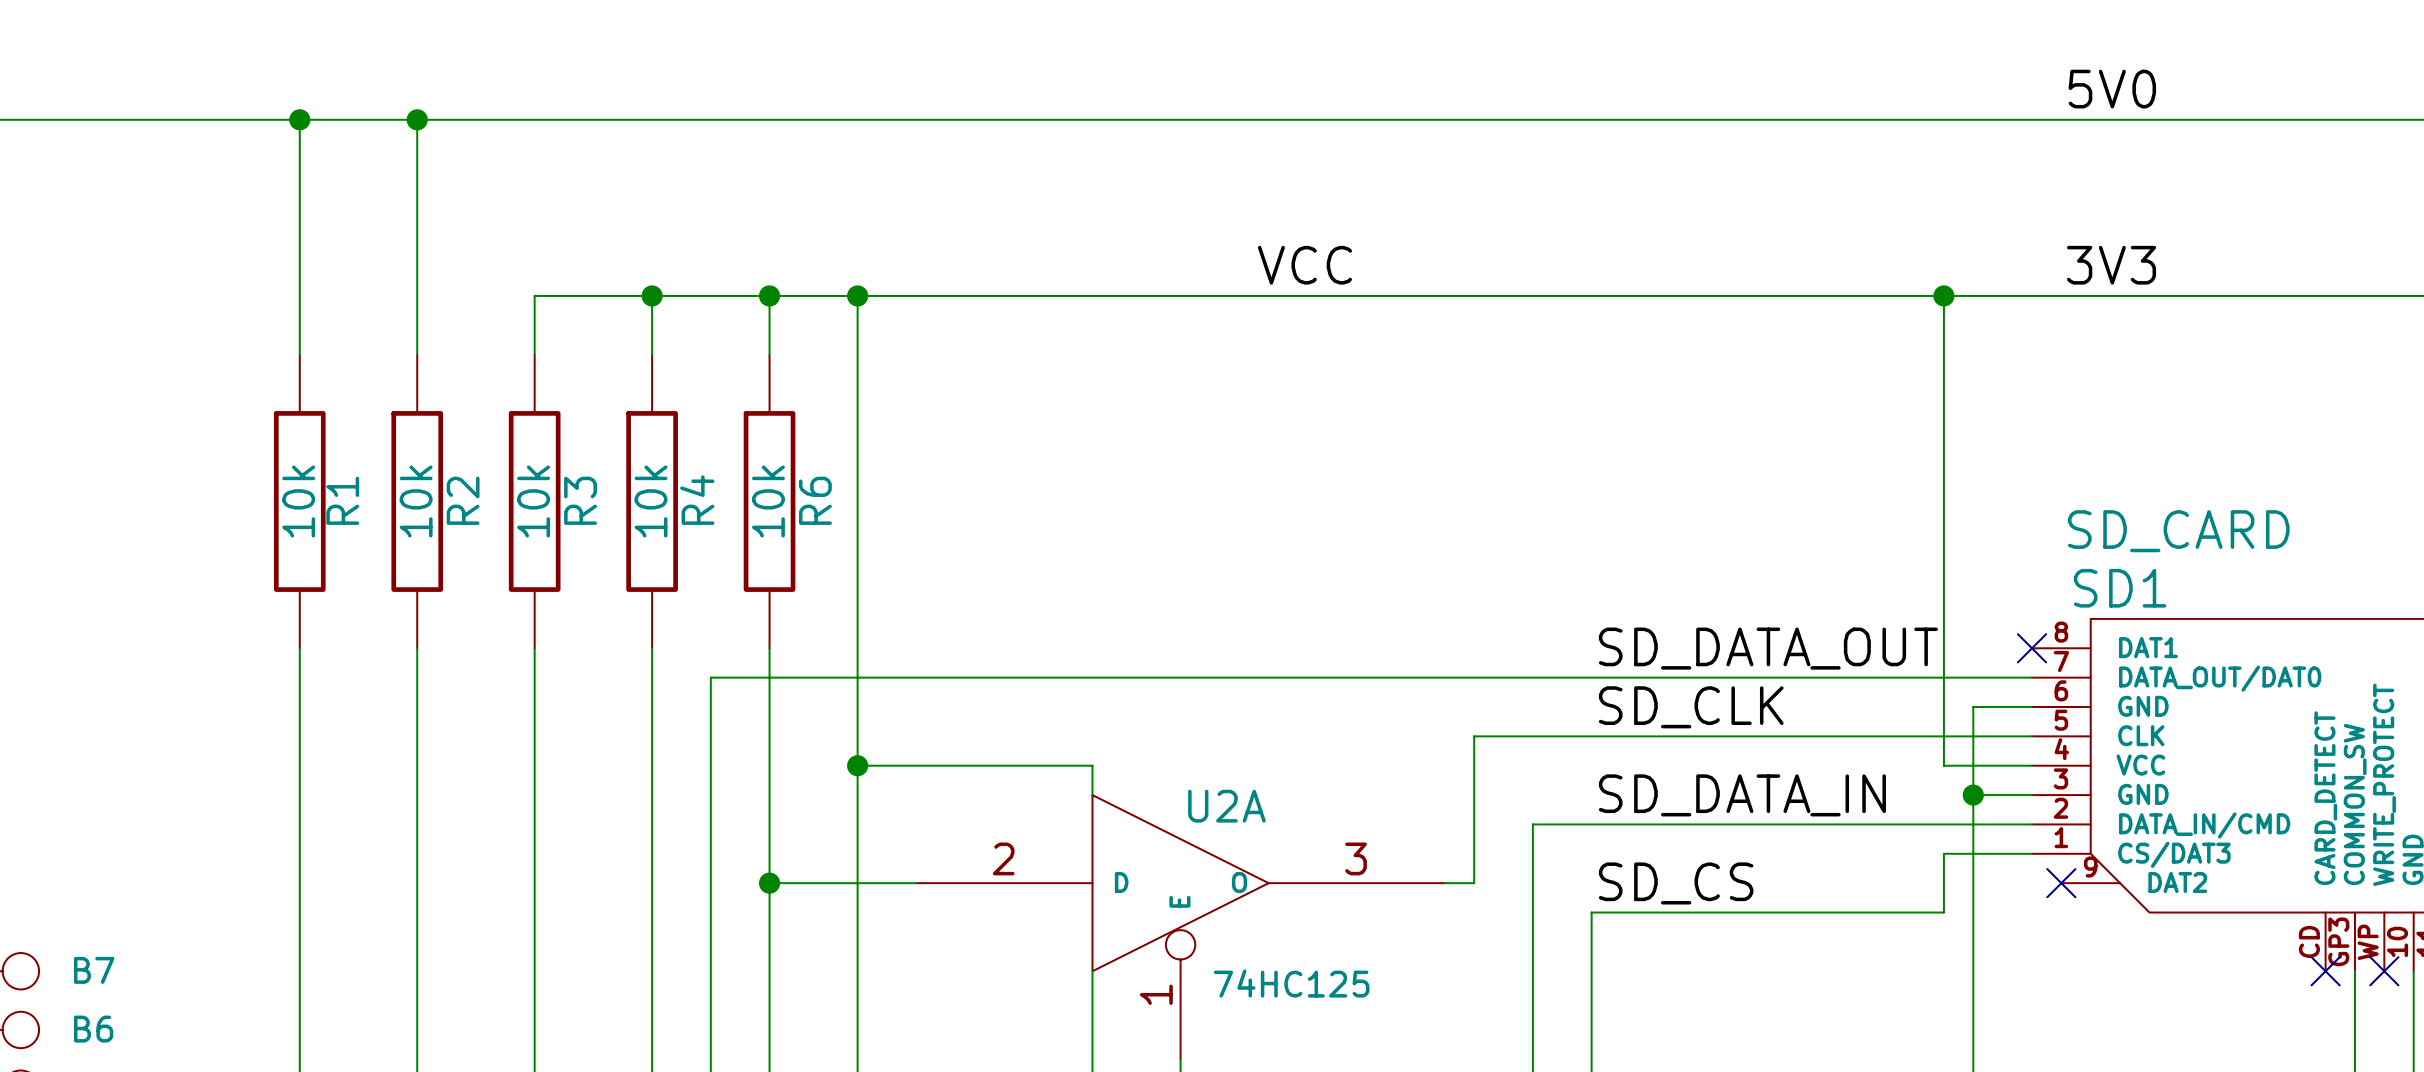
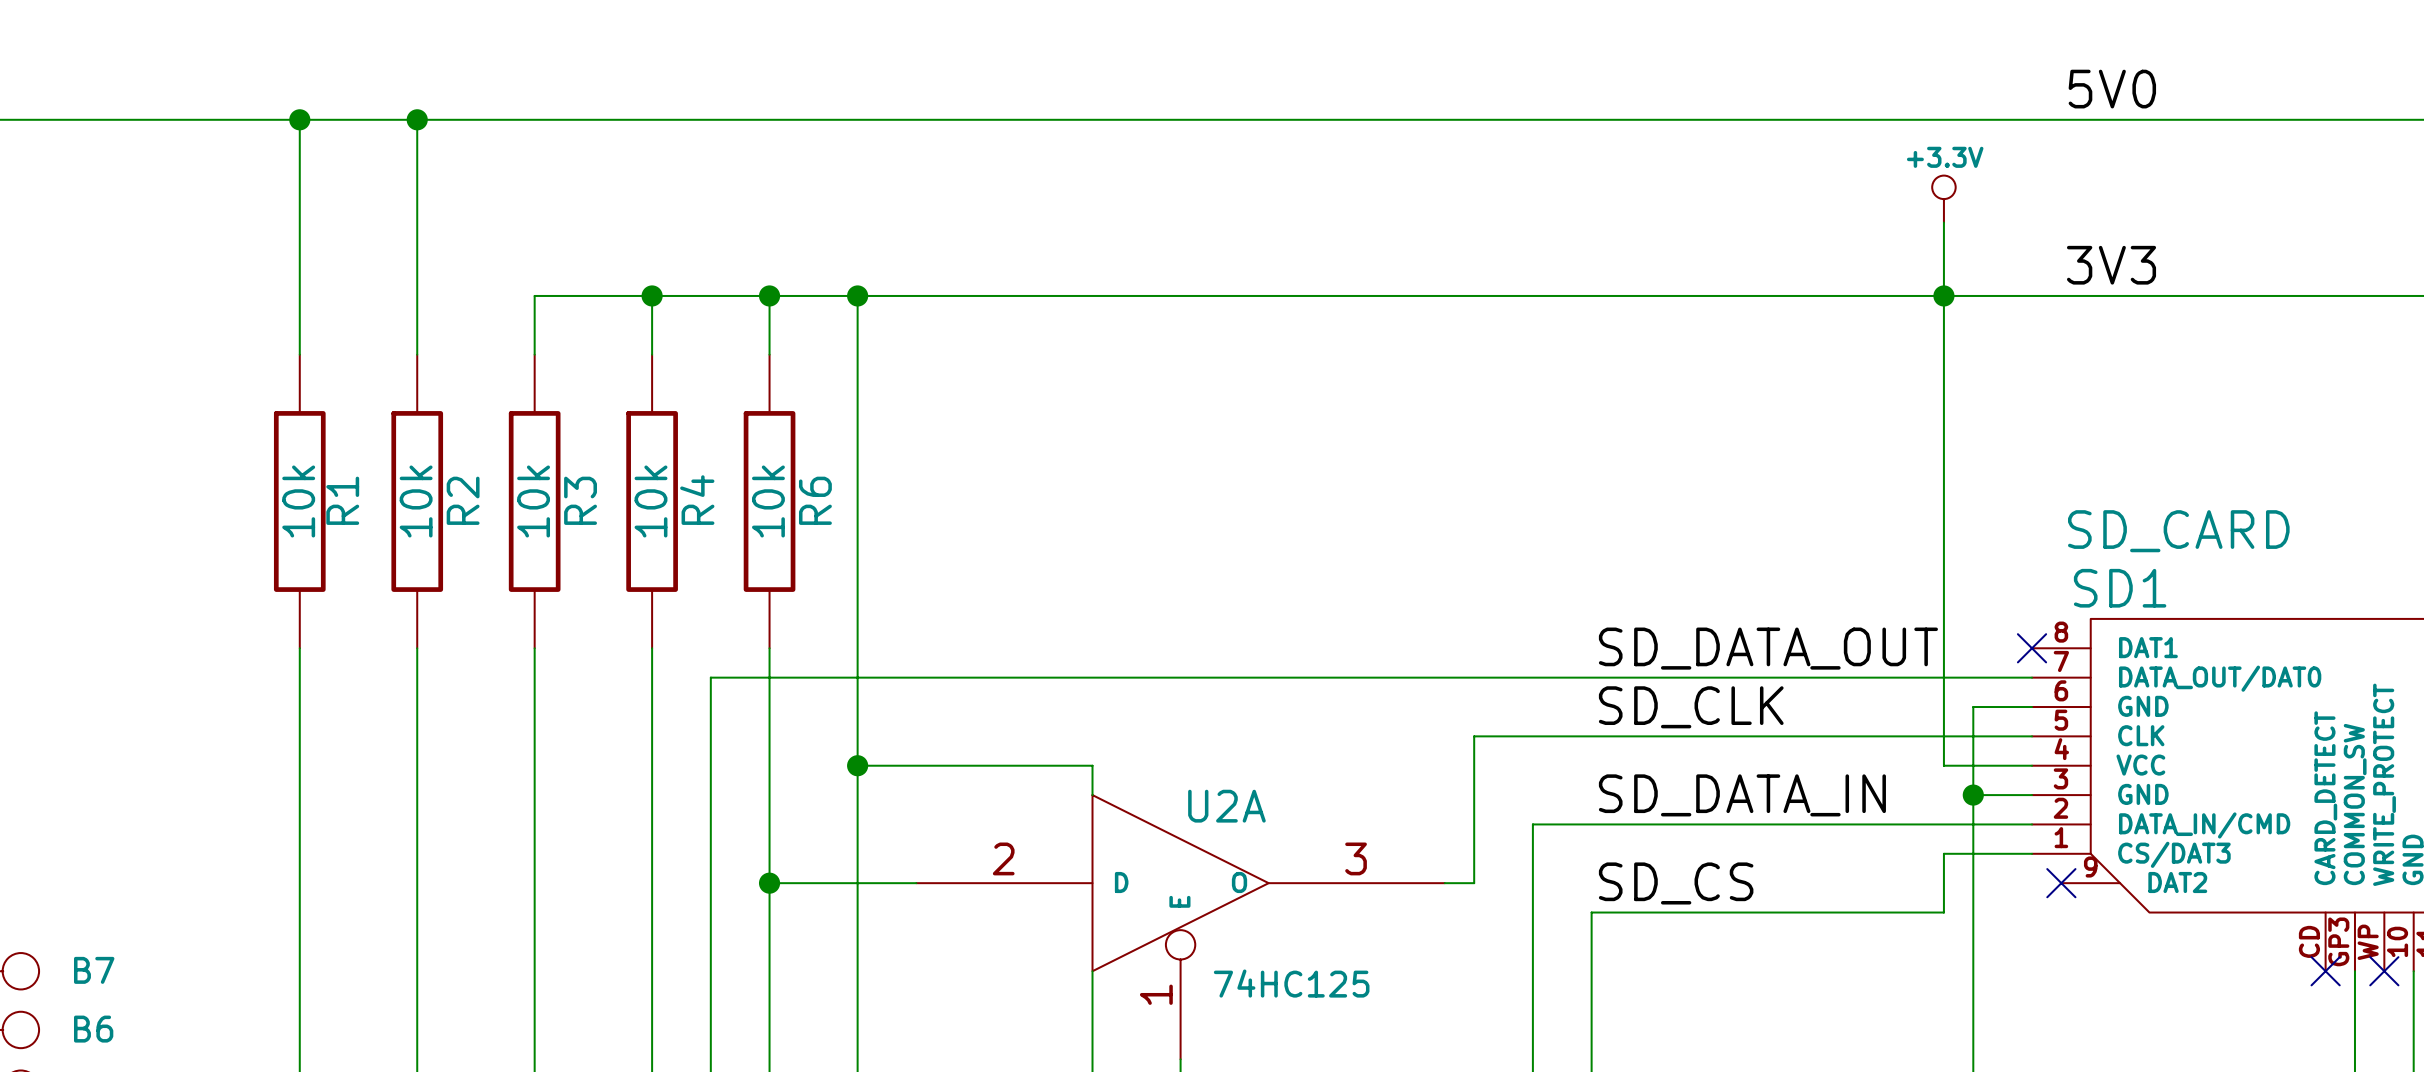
power symbol: none -> +3.3V (1943, 199)
wire: none -> (1943, 222) (1943, 295)
label: VCC (1304, 265) -> none

